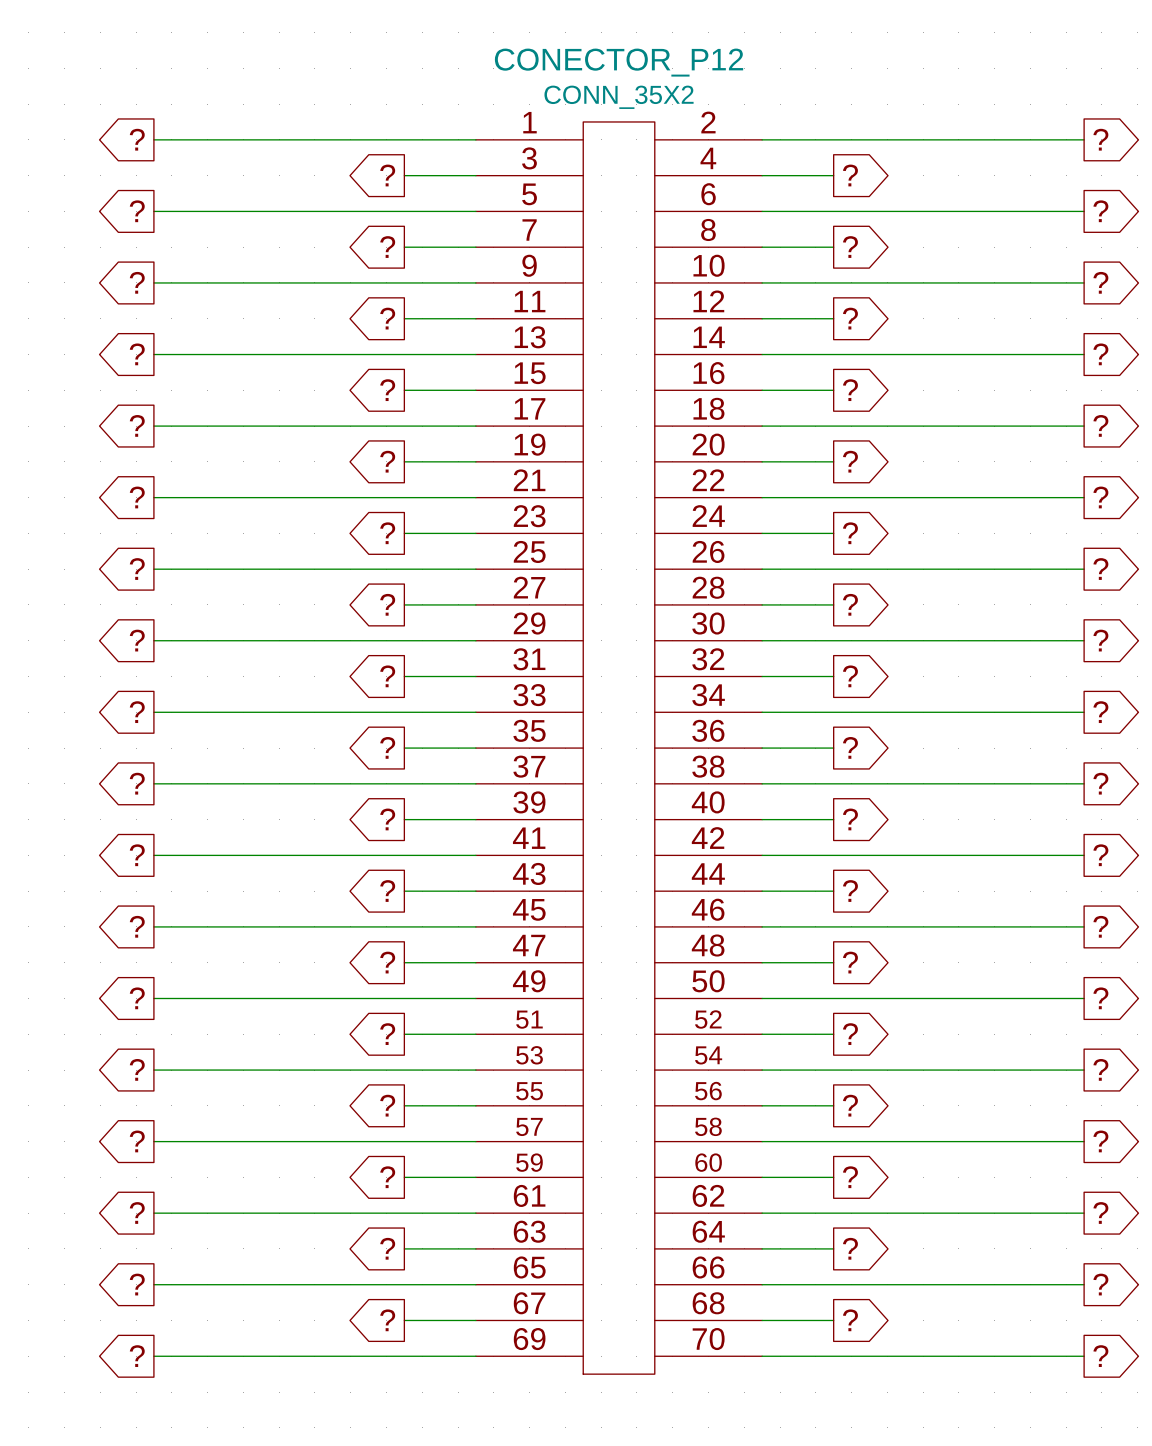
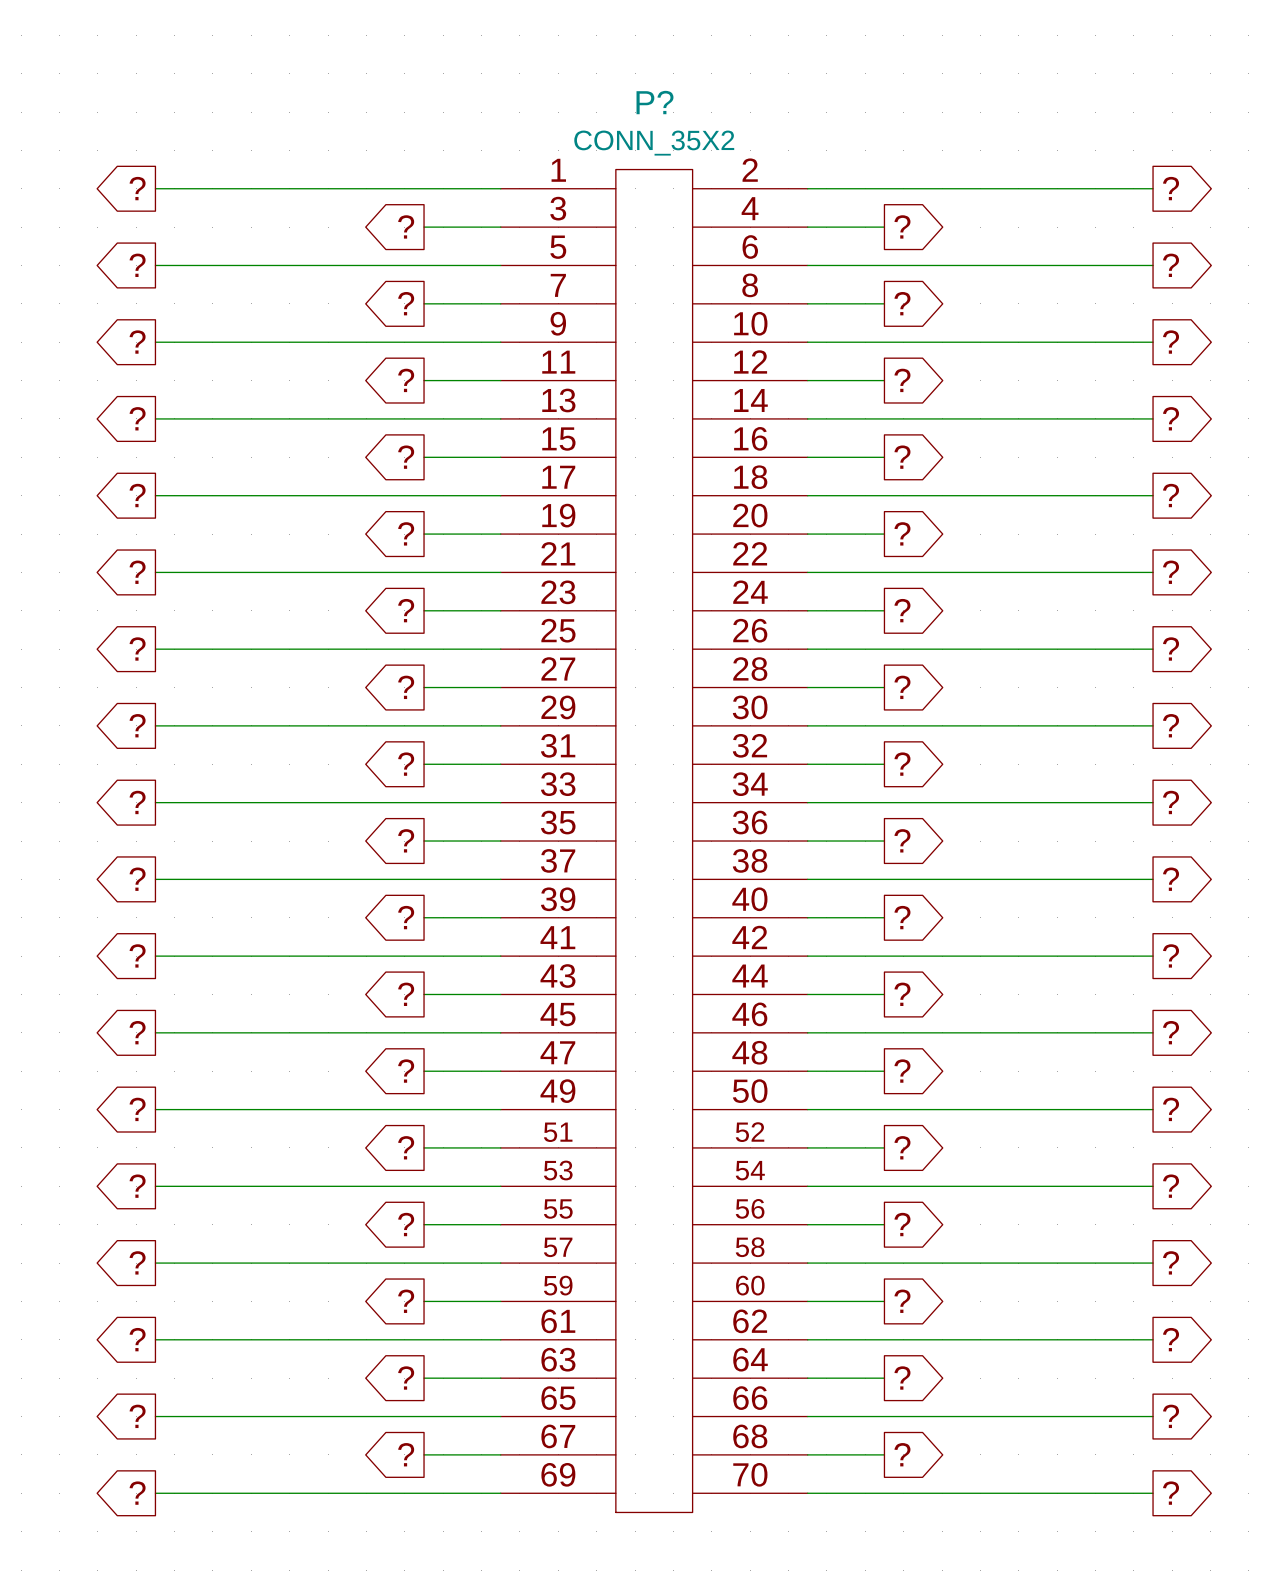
CONECTOR_P12 name: CONECTOR_P12 (619, 62) -> P? (654, 102)

